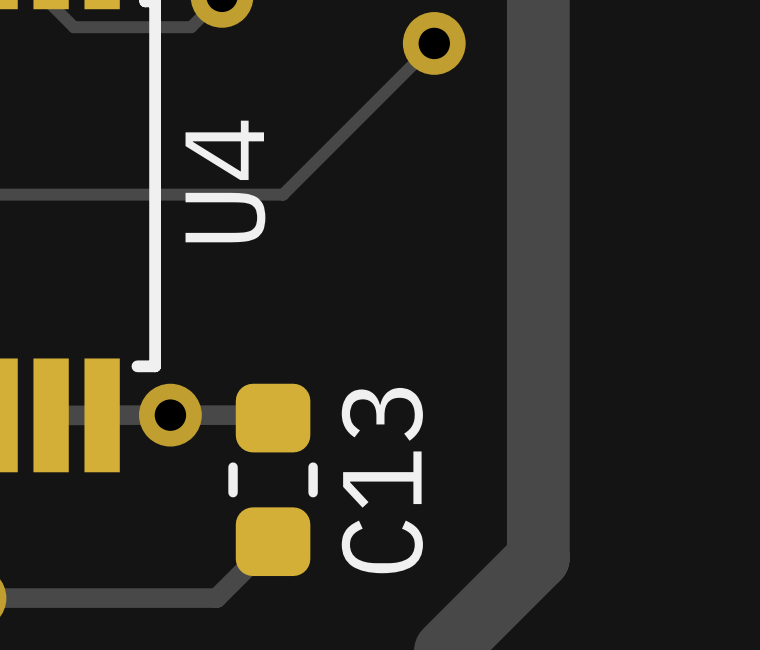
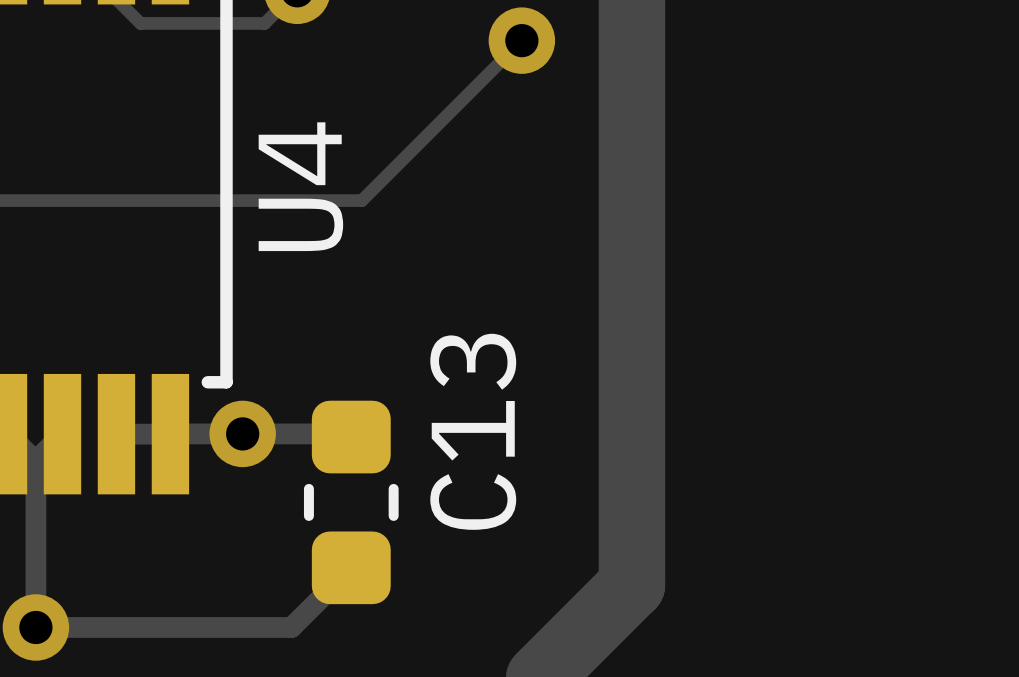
C13 name position: C13 (382, 480) -> C13 (473, 431)

